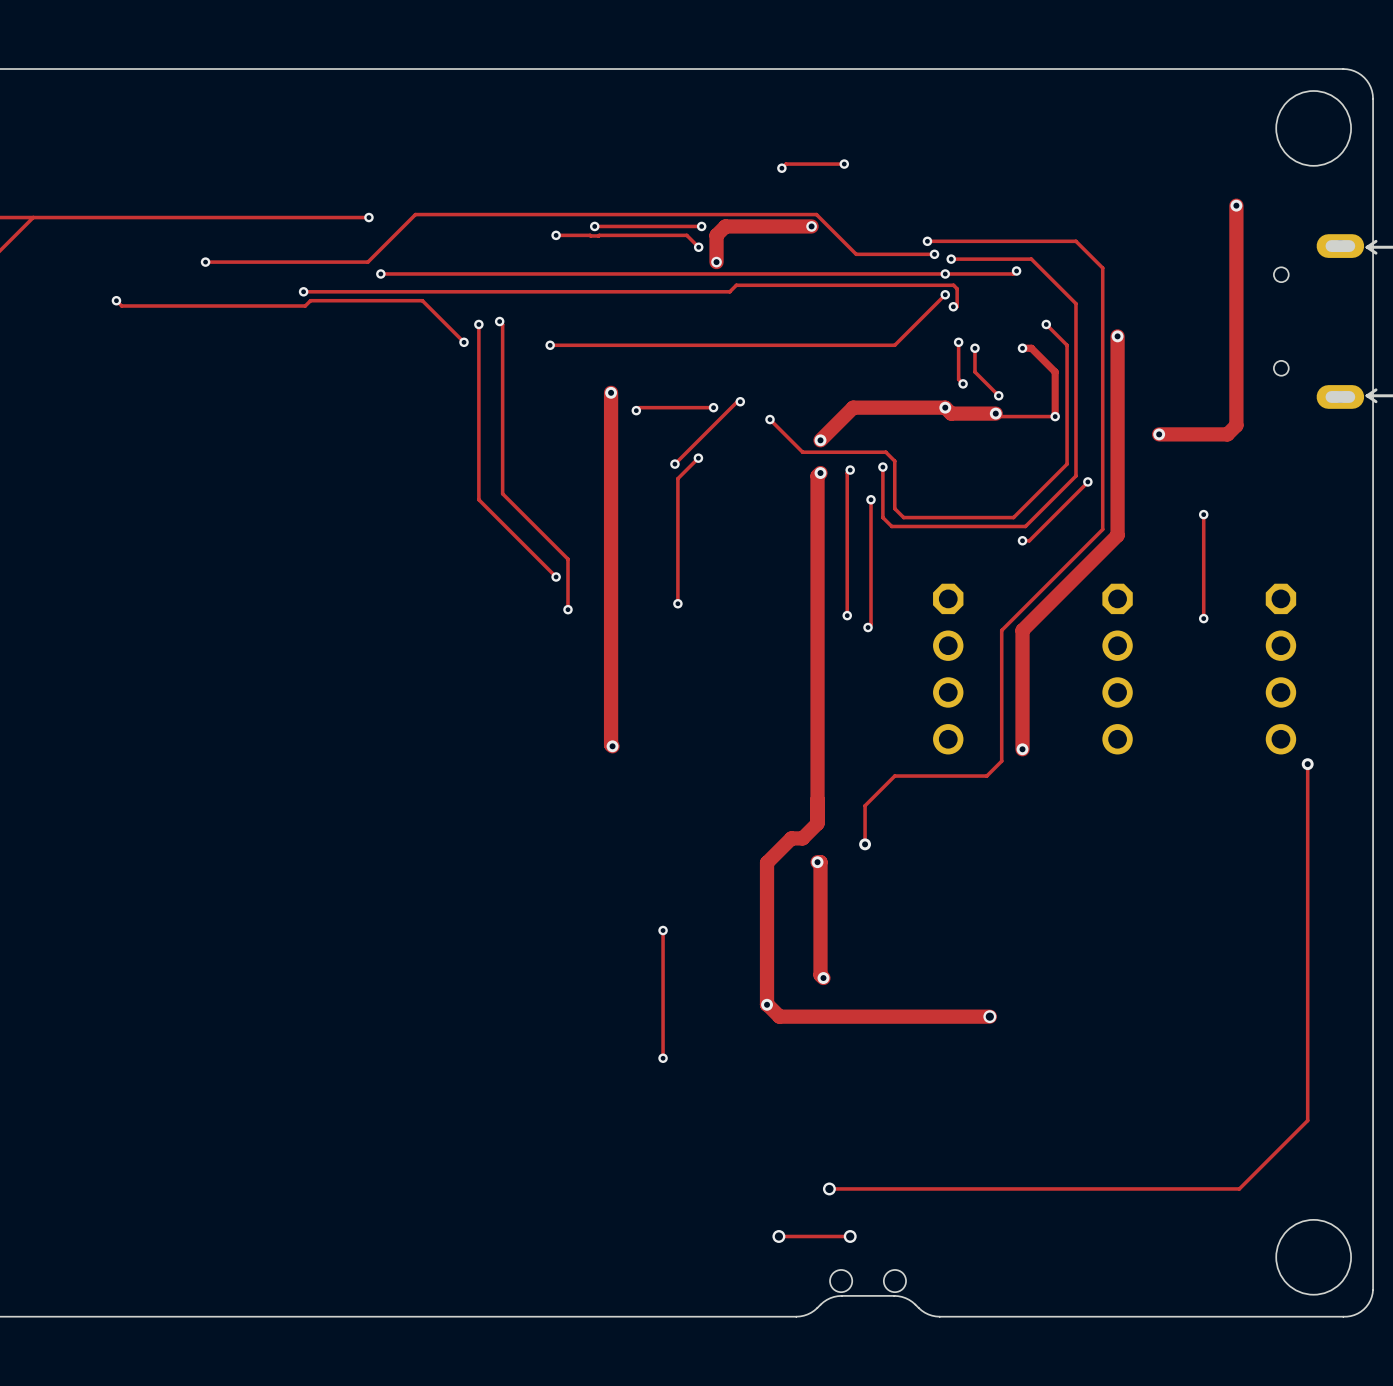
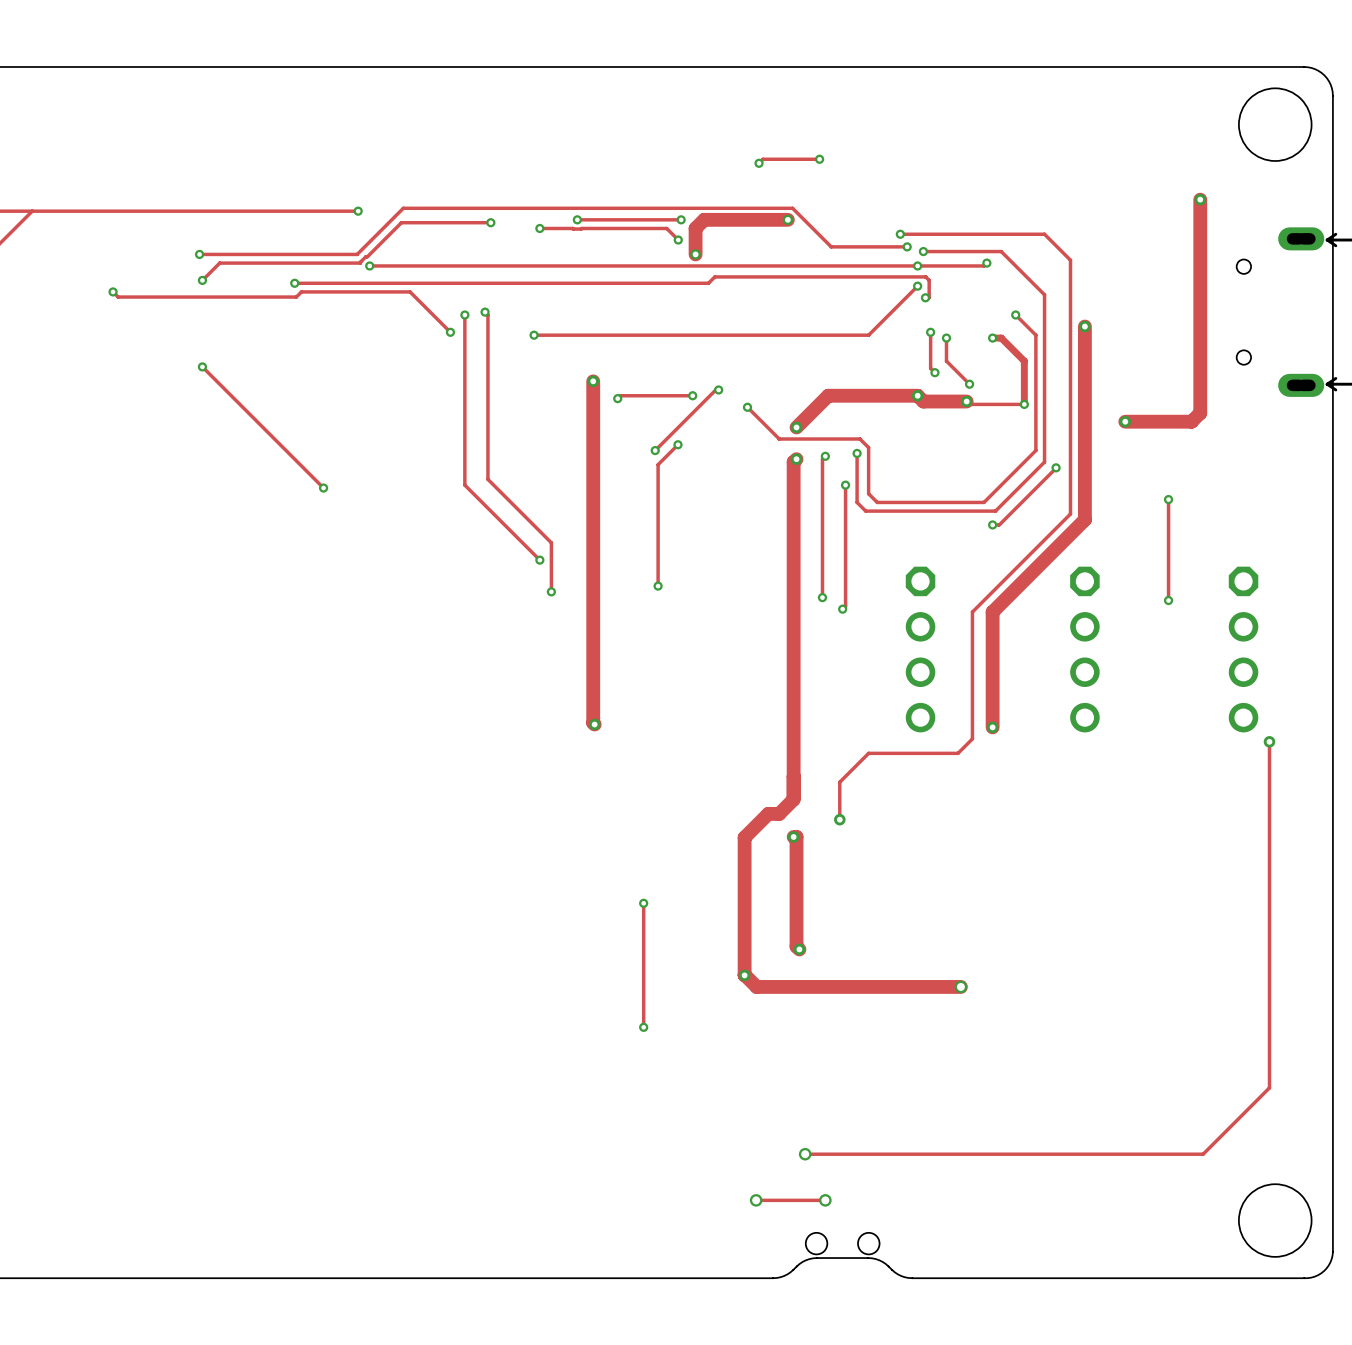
track: none -> (490, 222) (401, 222) (360, 263) (219, 263) (202, 280)
via: none -> (490, 222)
via: none -> (202, 280)
track: none -> (202, 366) (323, 488)
via: none -> (202, 366)
via: none -> (323, 488)

